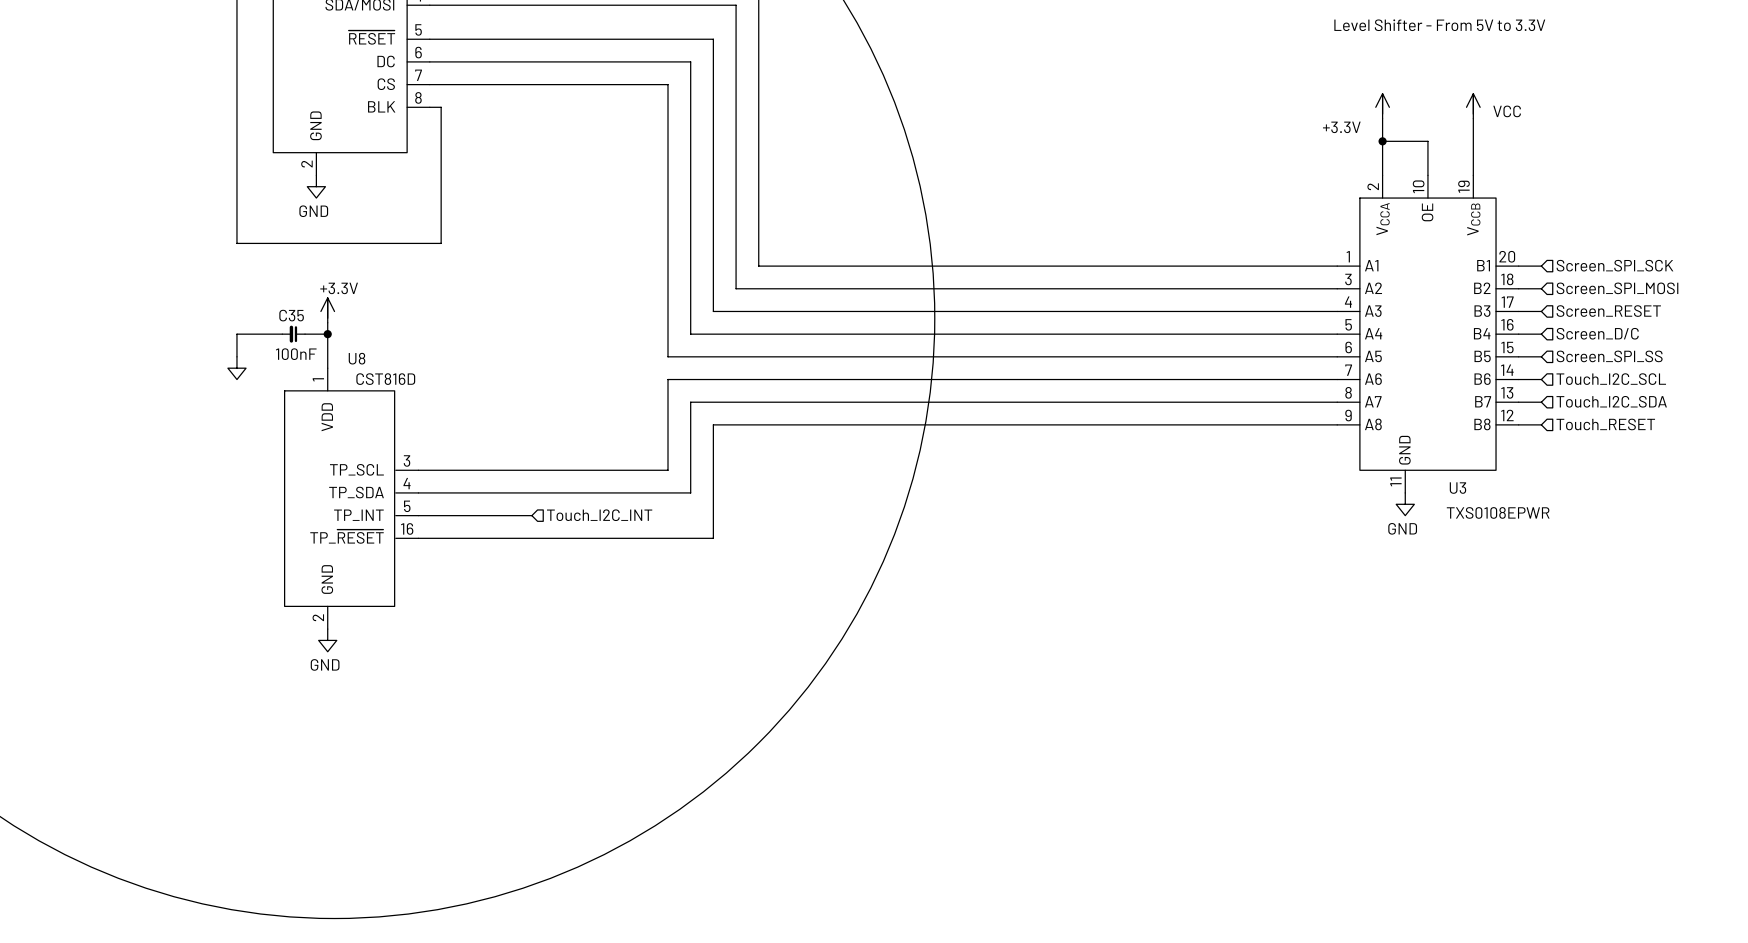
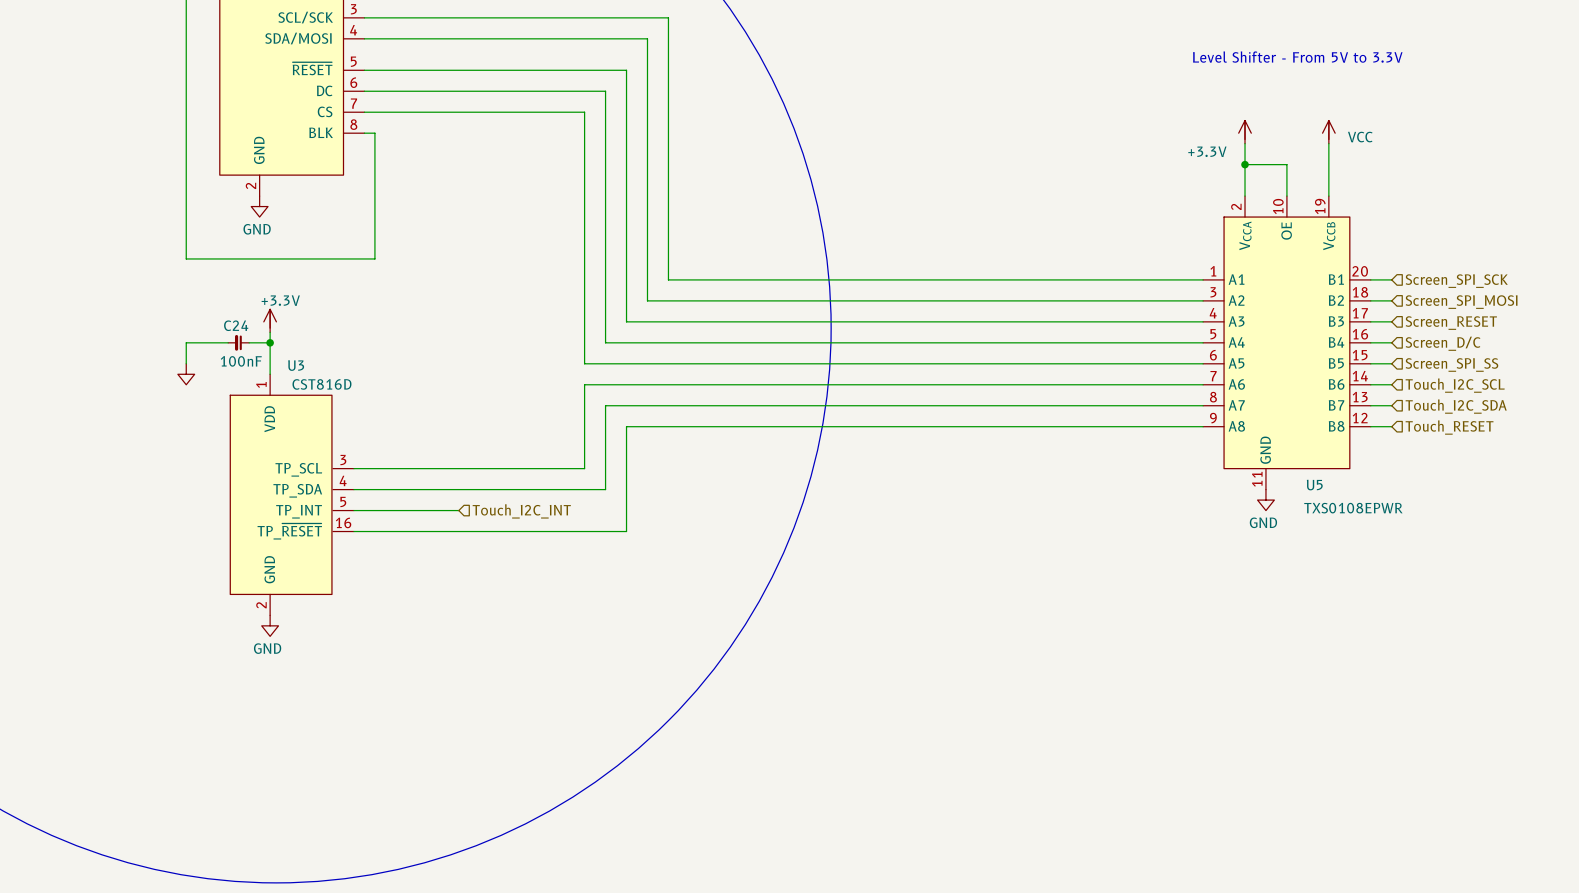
C35 name: C35 (291, 315) -> C24 (236, 325)
U8 name: U8 (357, 358) -> U3 (296, 365)
U3 name: U3 (1457, 488) -> U5 (1314, 485)

